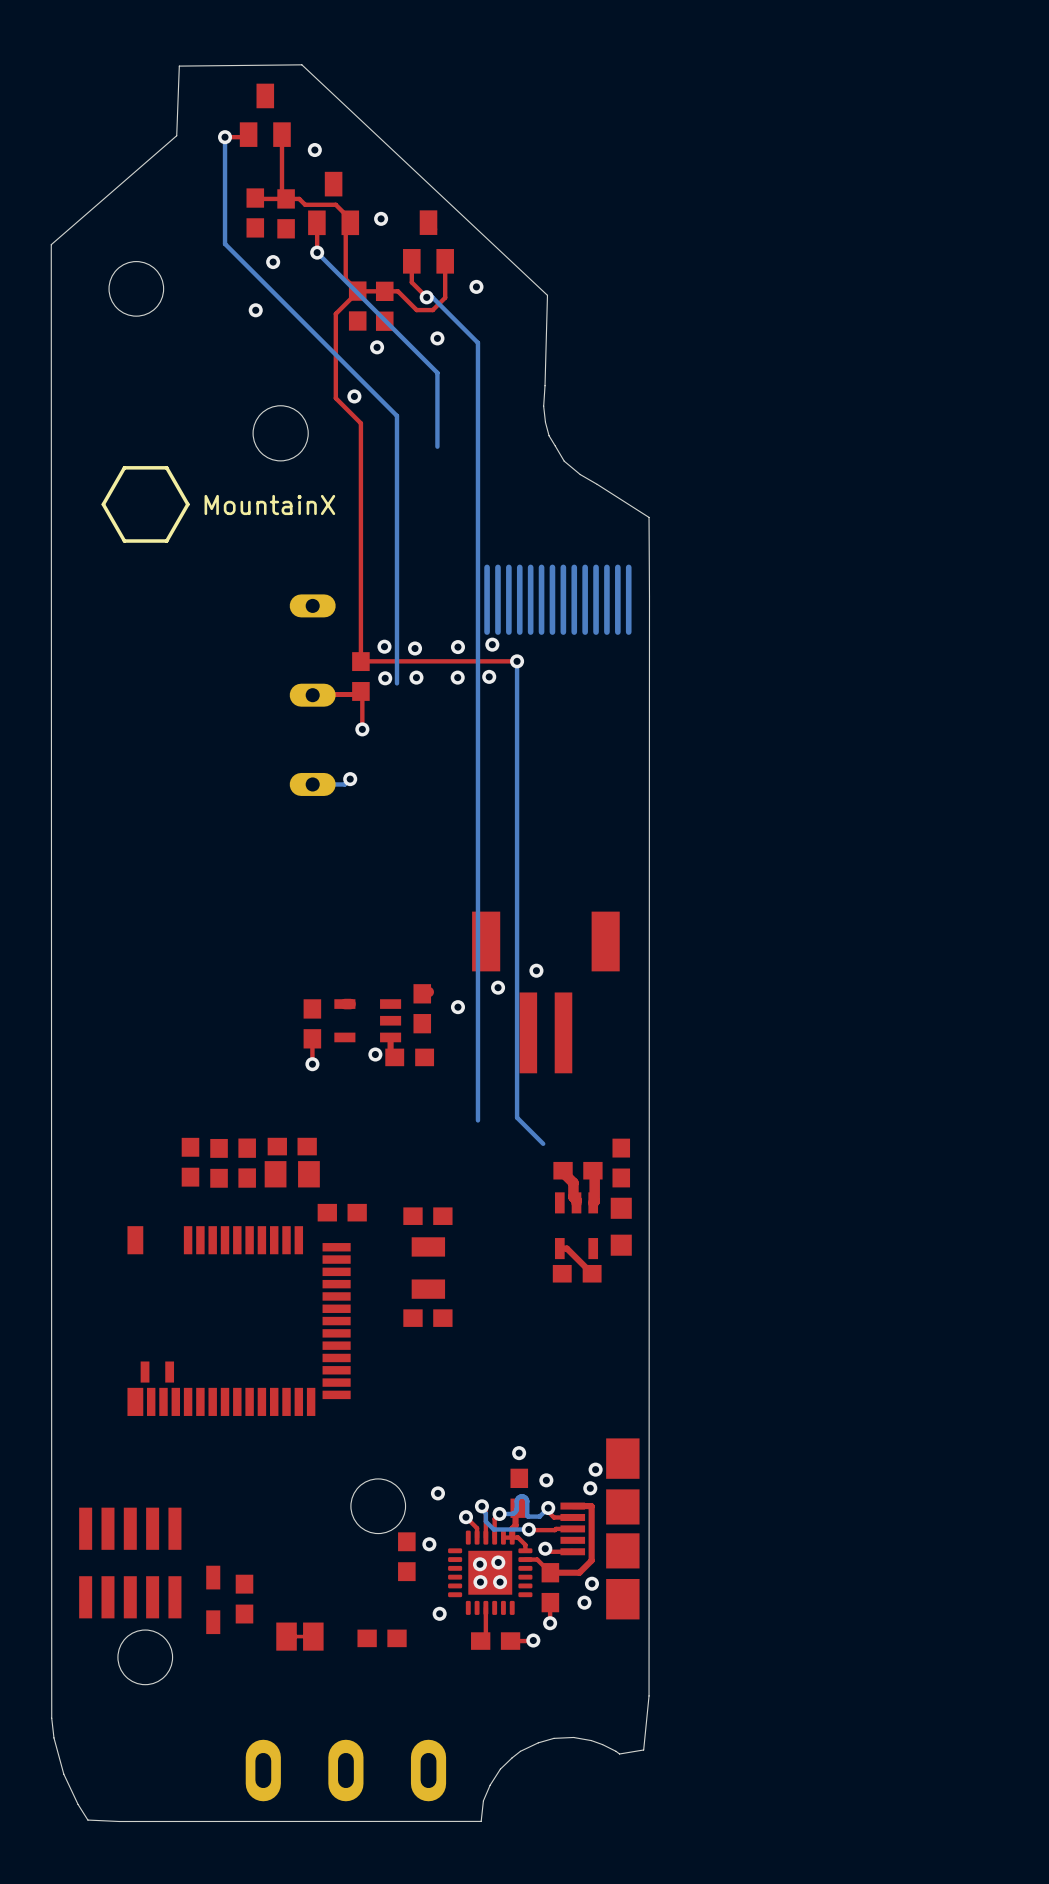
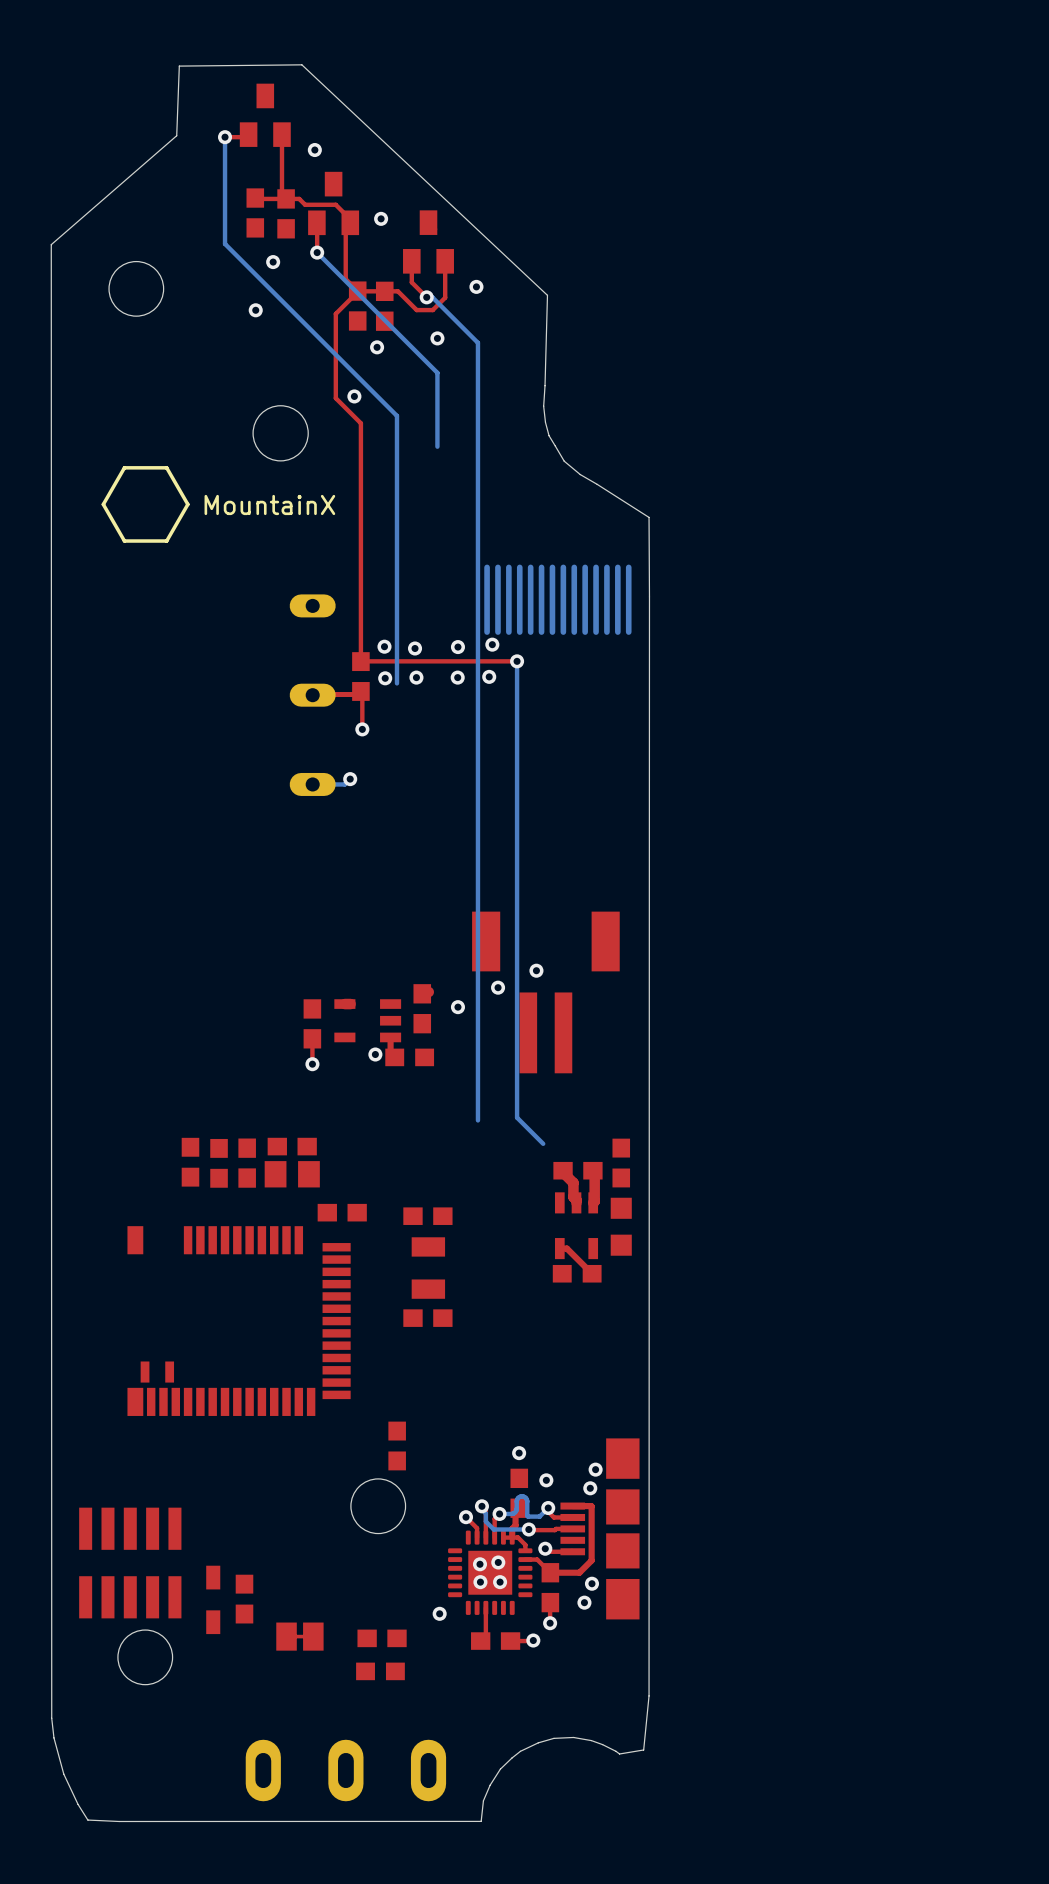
part: none -> (397, 1445)
via: (437, 1493) -> none
via: (429, 1544) -> none
part: (406, 1556) -> none
part: none -> (380, 1671)

